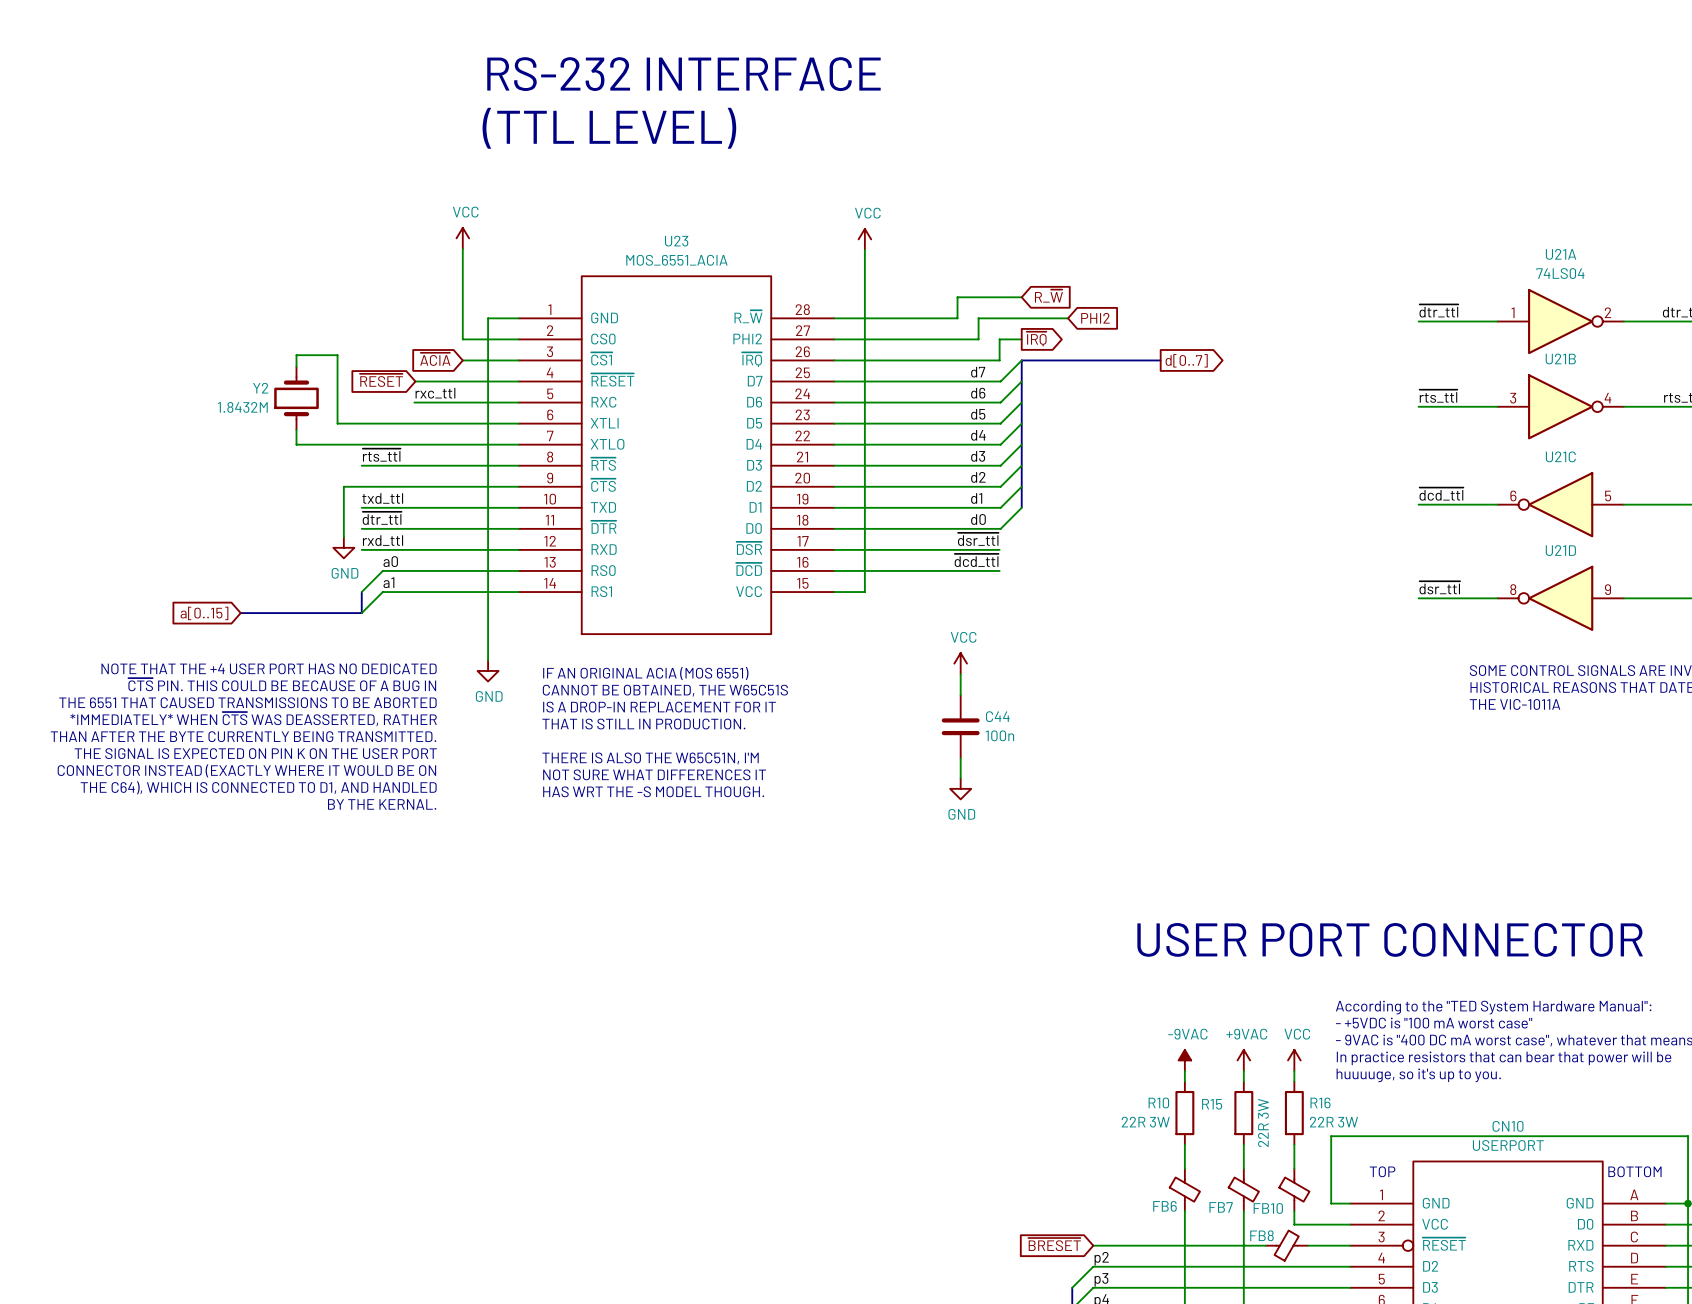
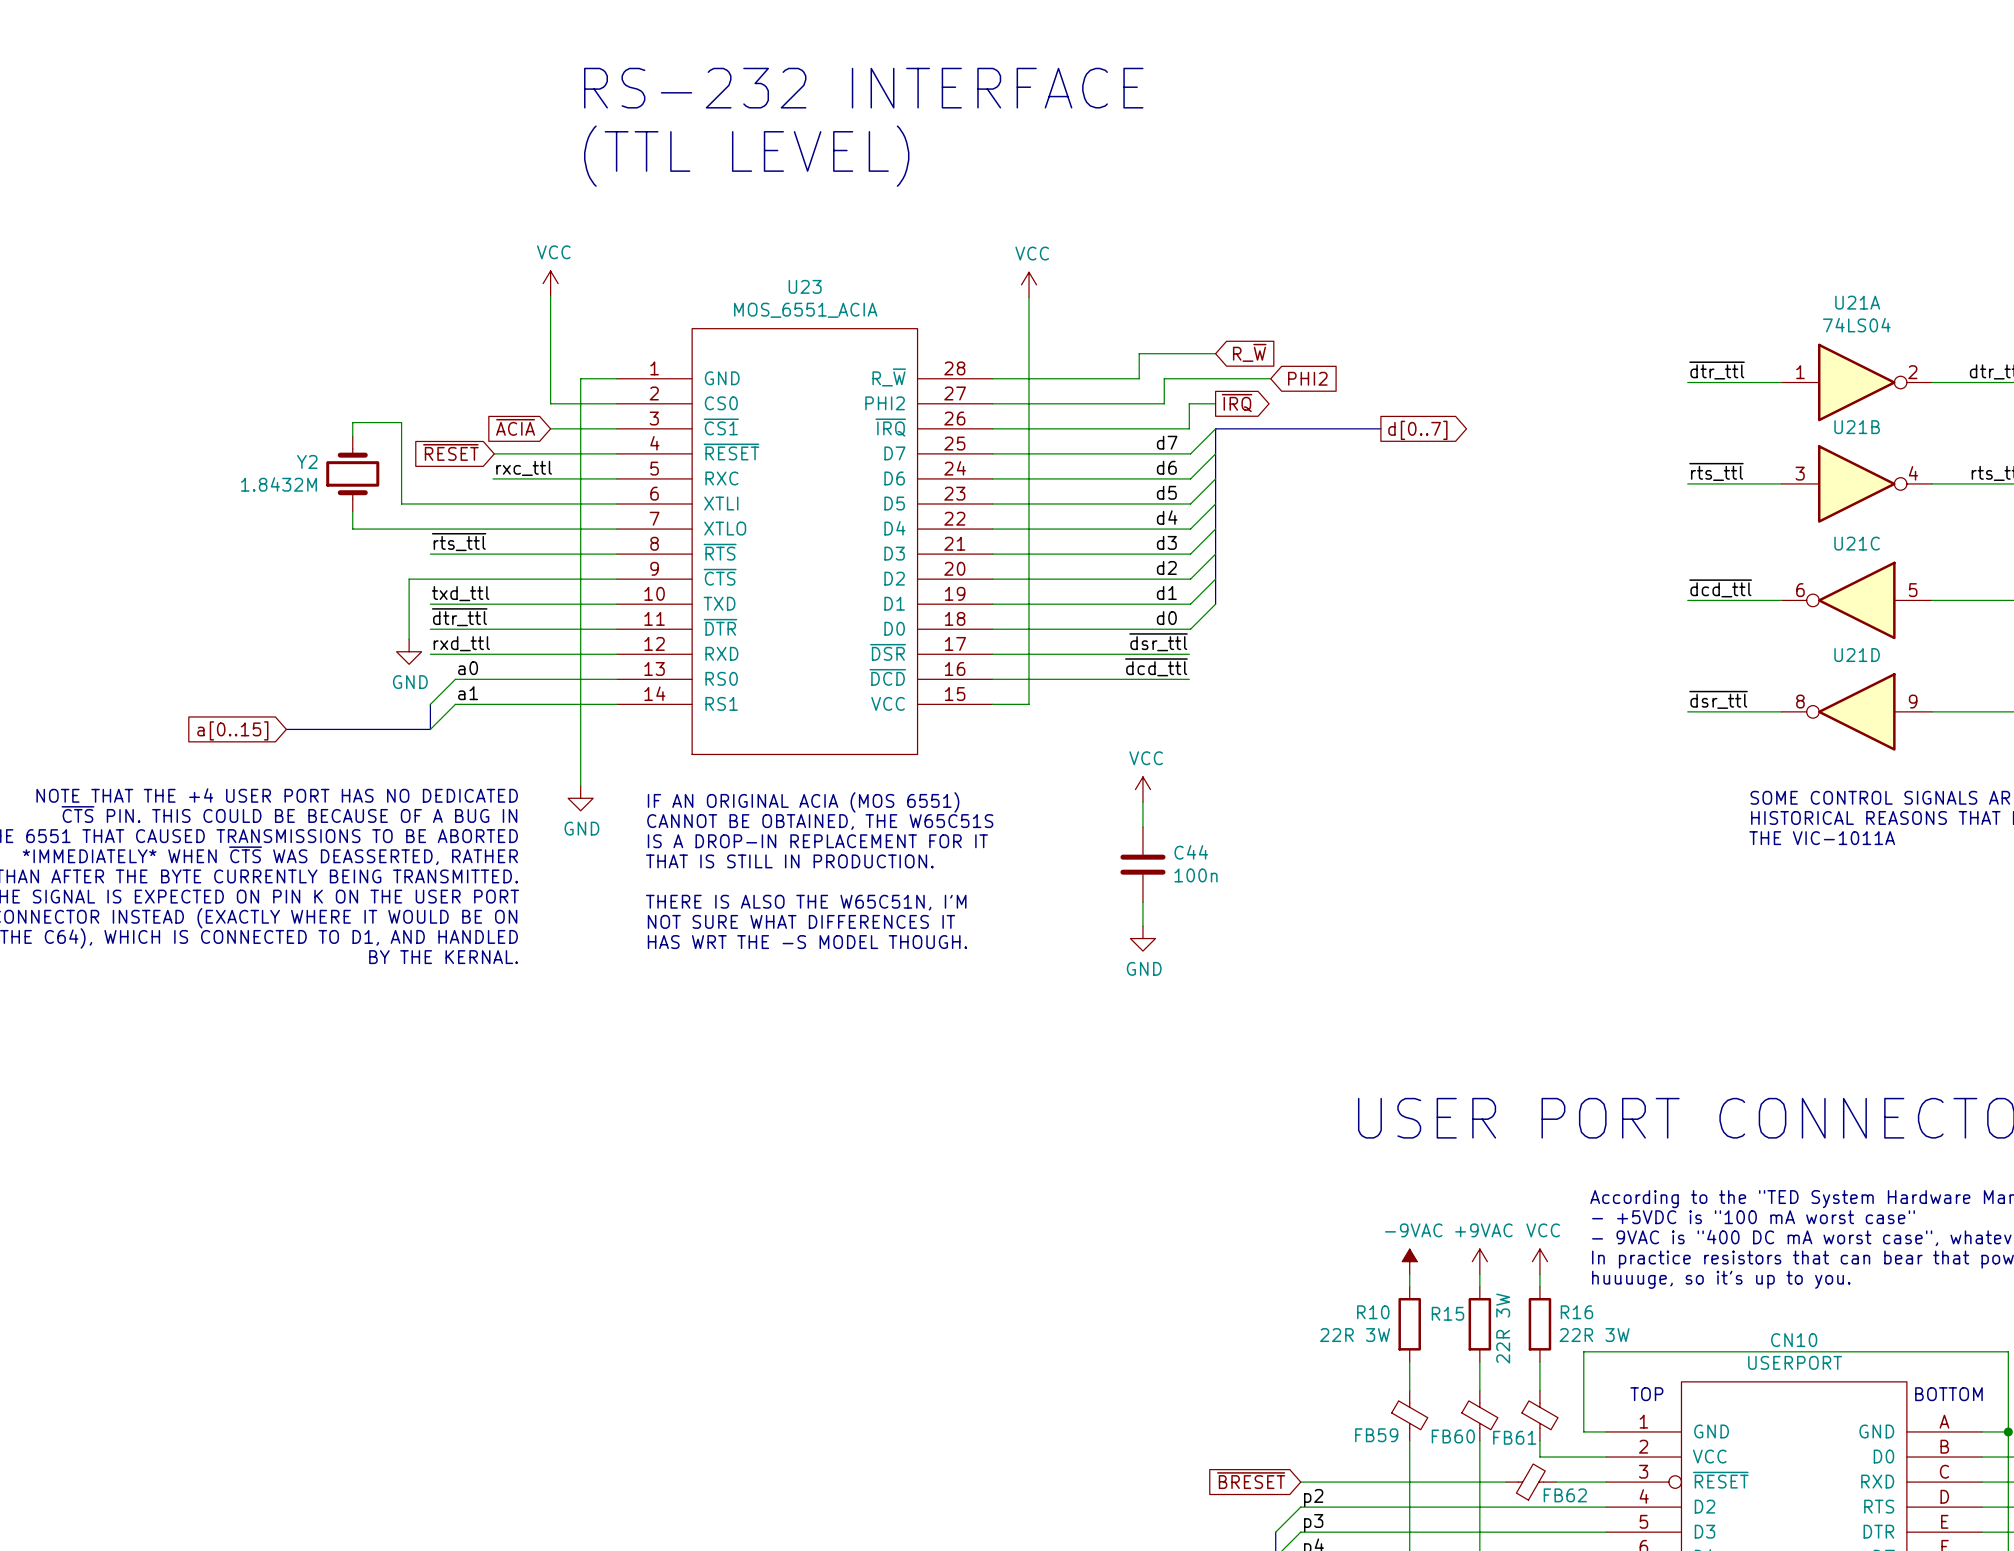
FB6 name: FB6 (1164, 1206) -> FB59 (1376, 1435)
FB7 name: FB7 (1221, 1207) -> FB60 (1453, 1436)
FB10 name: FB10 (1268, 1208) -> FB61 (1514, 1437)
FB8 name: FB8 (1261, 1235) -> FB62 (1565, 1495)

